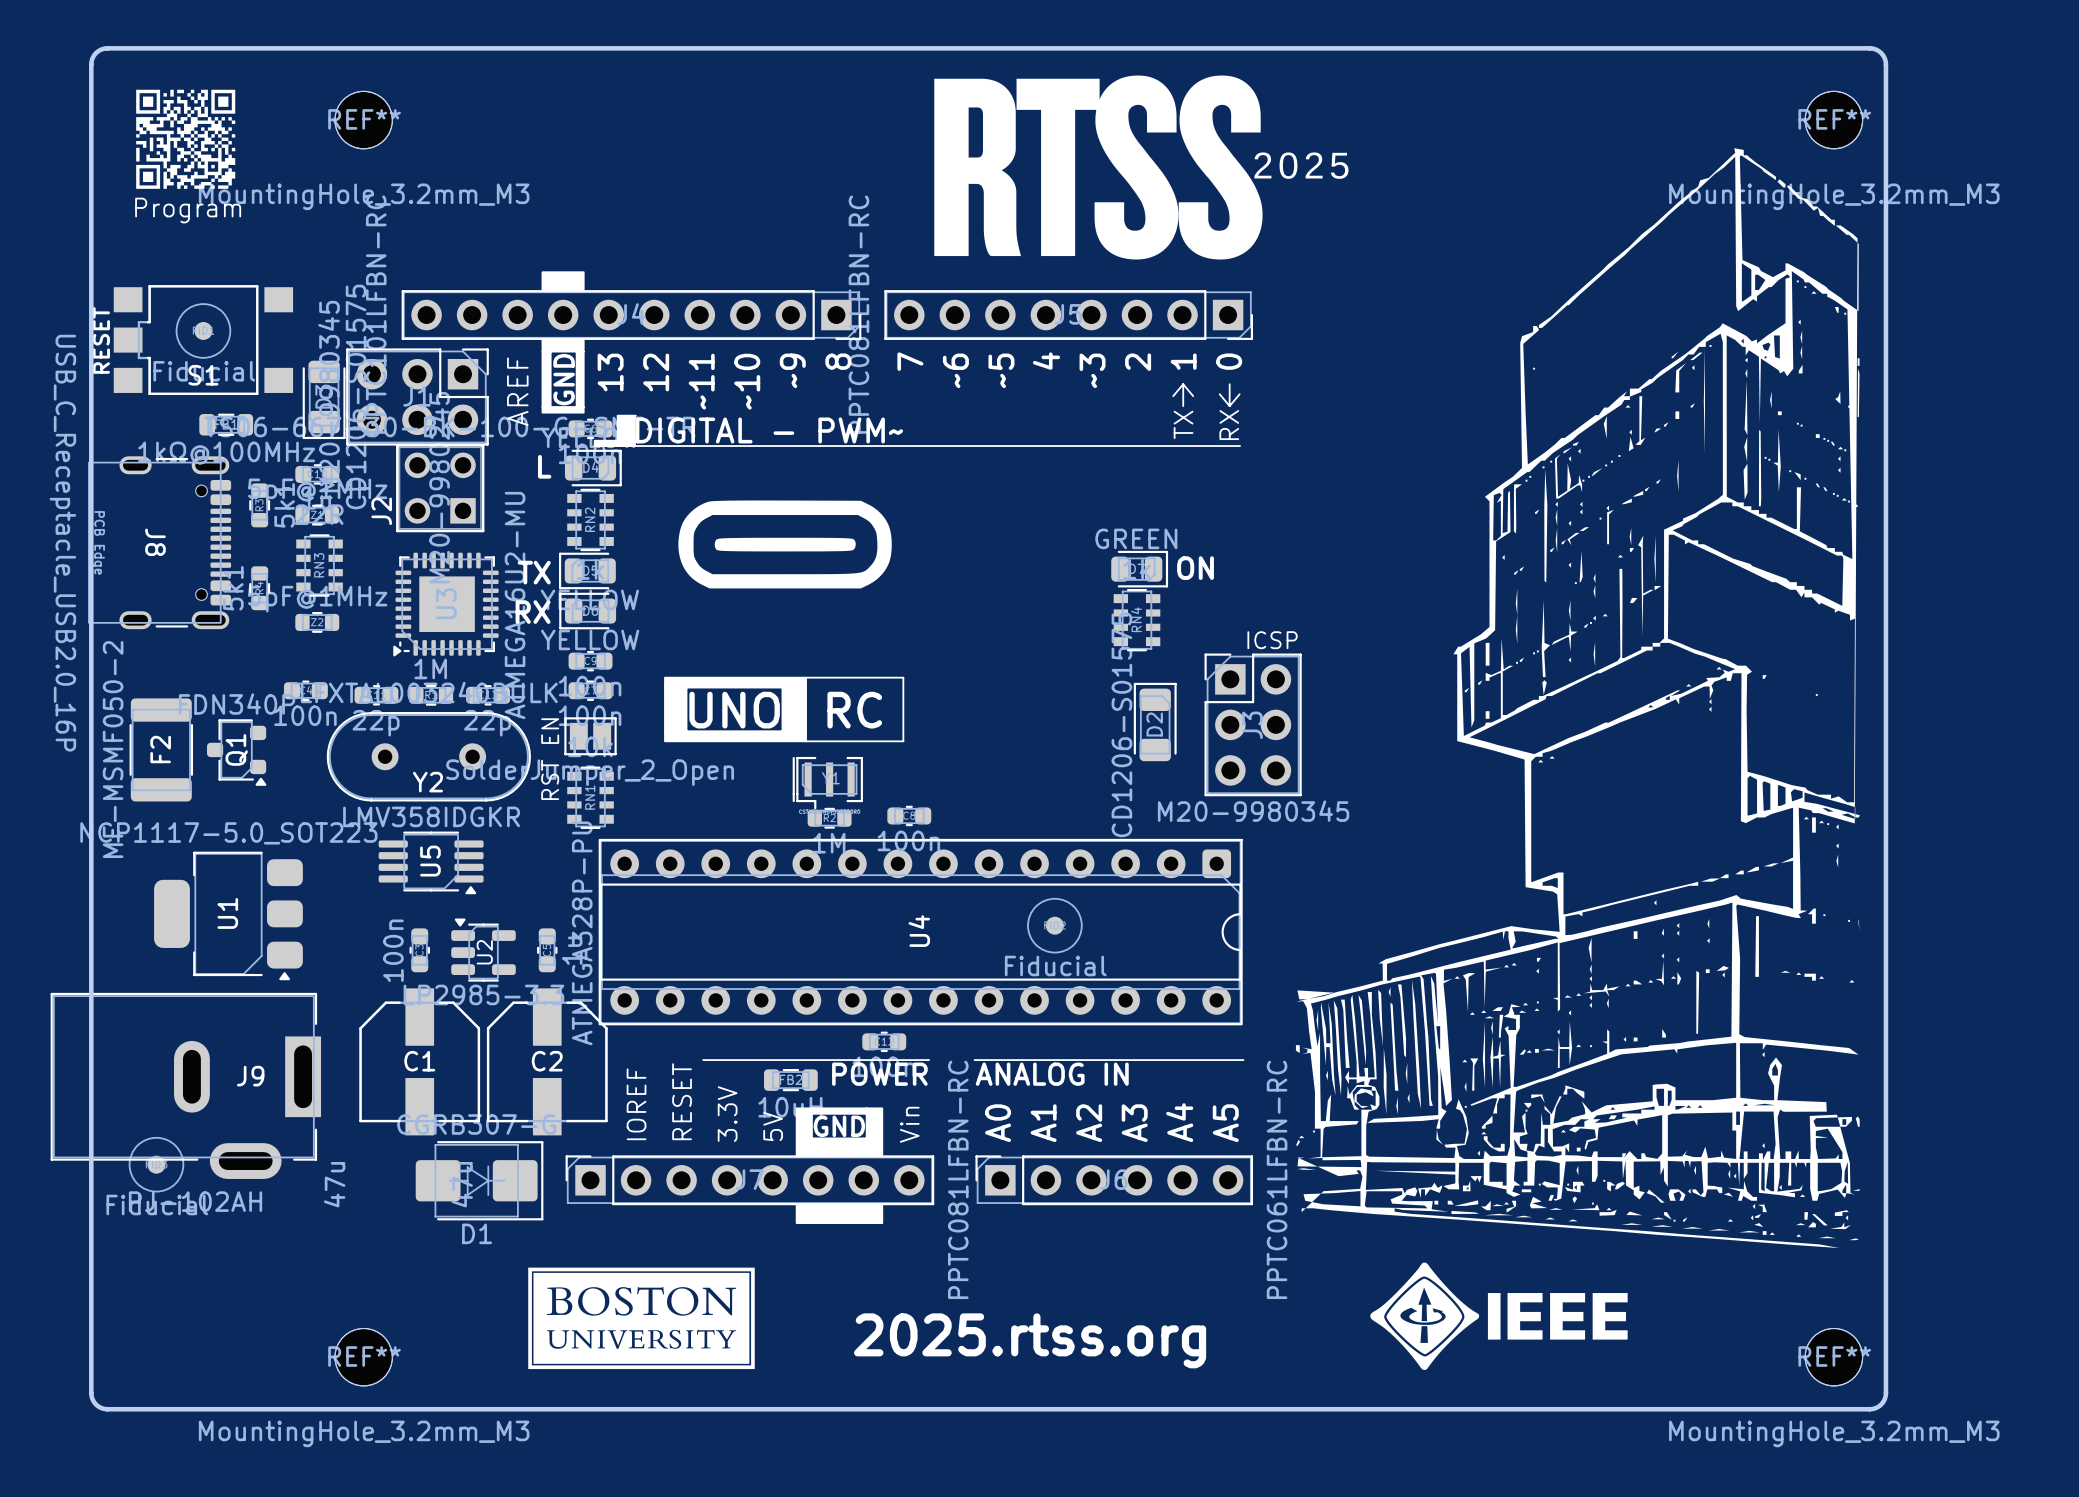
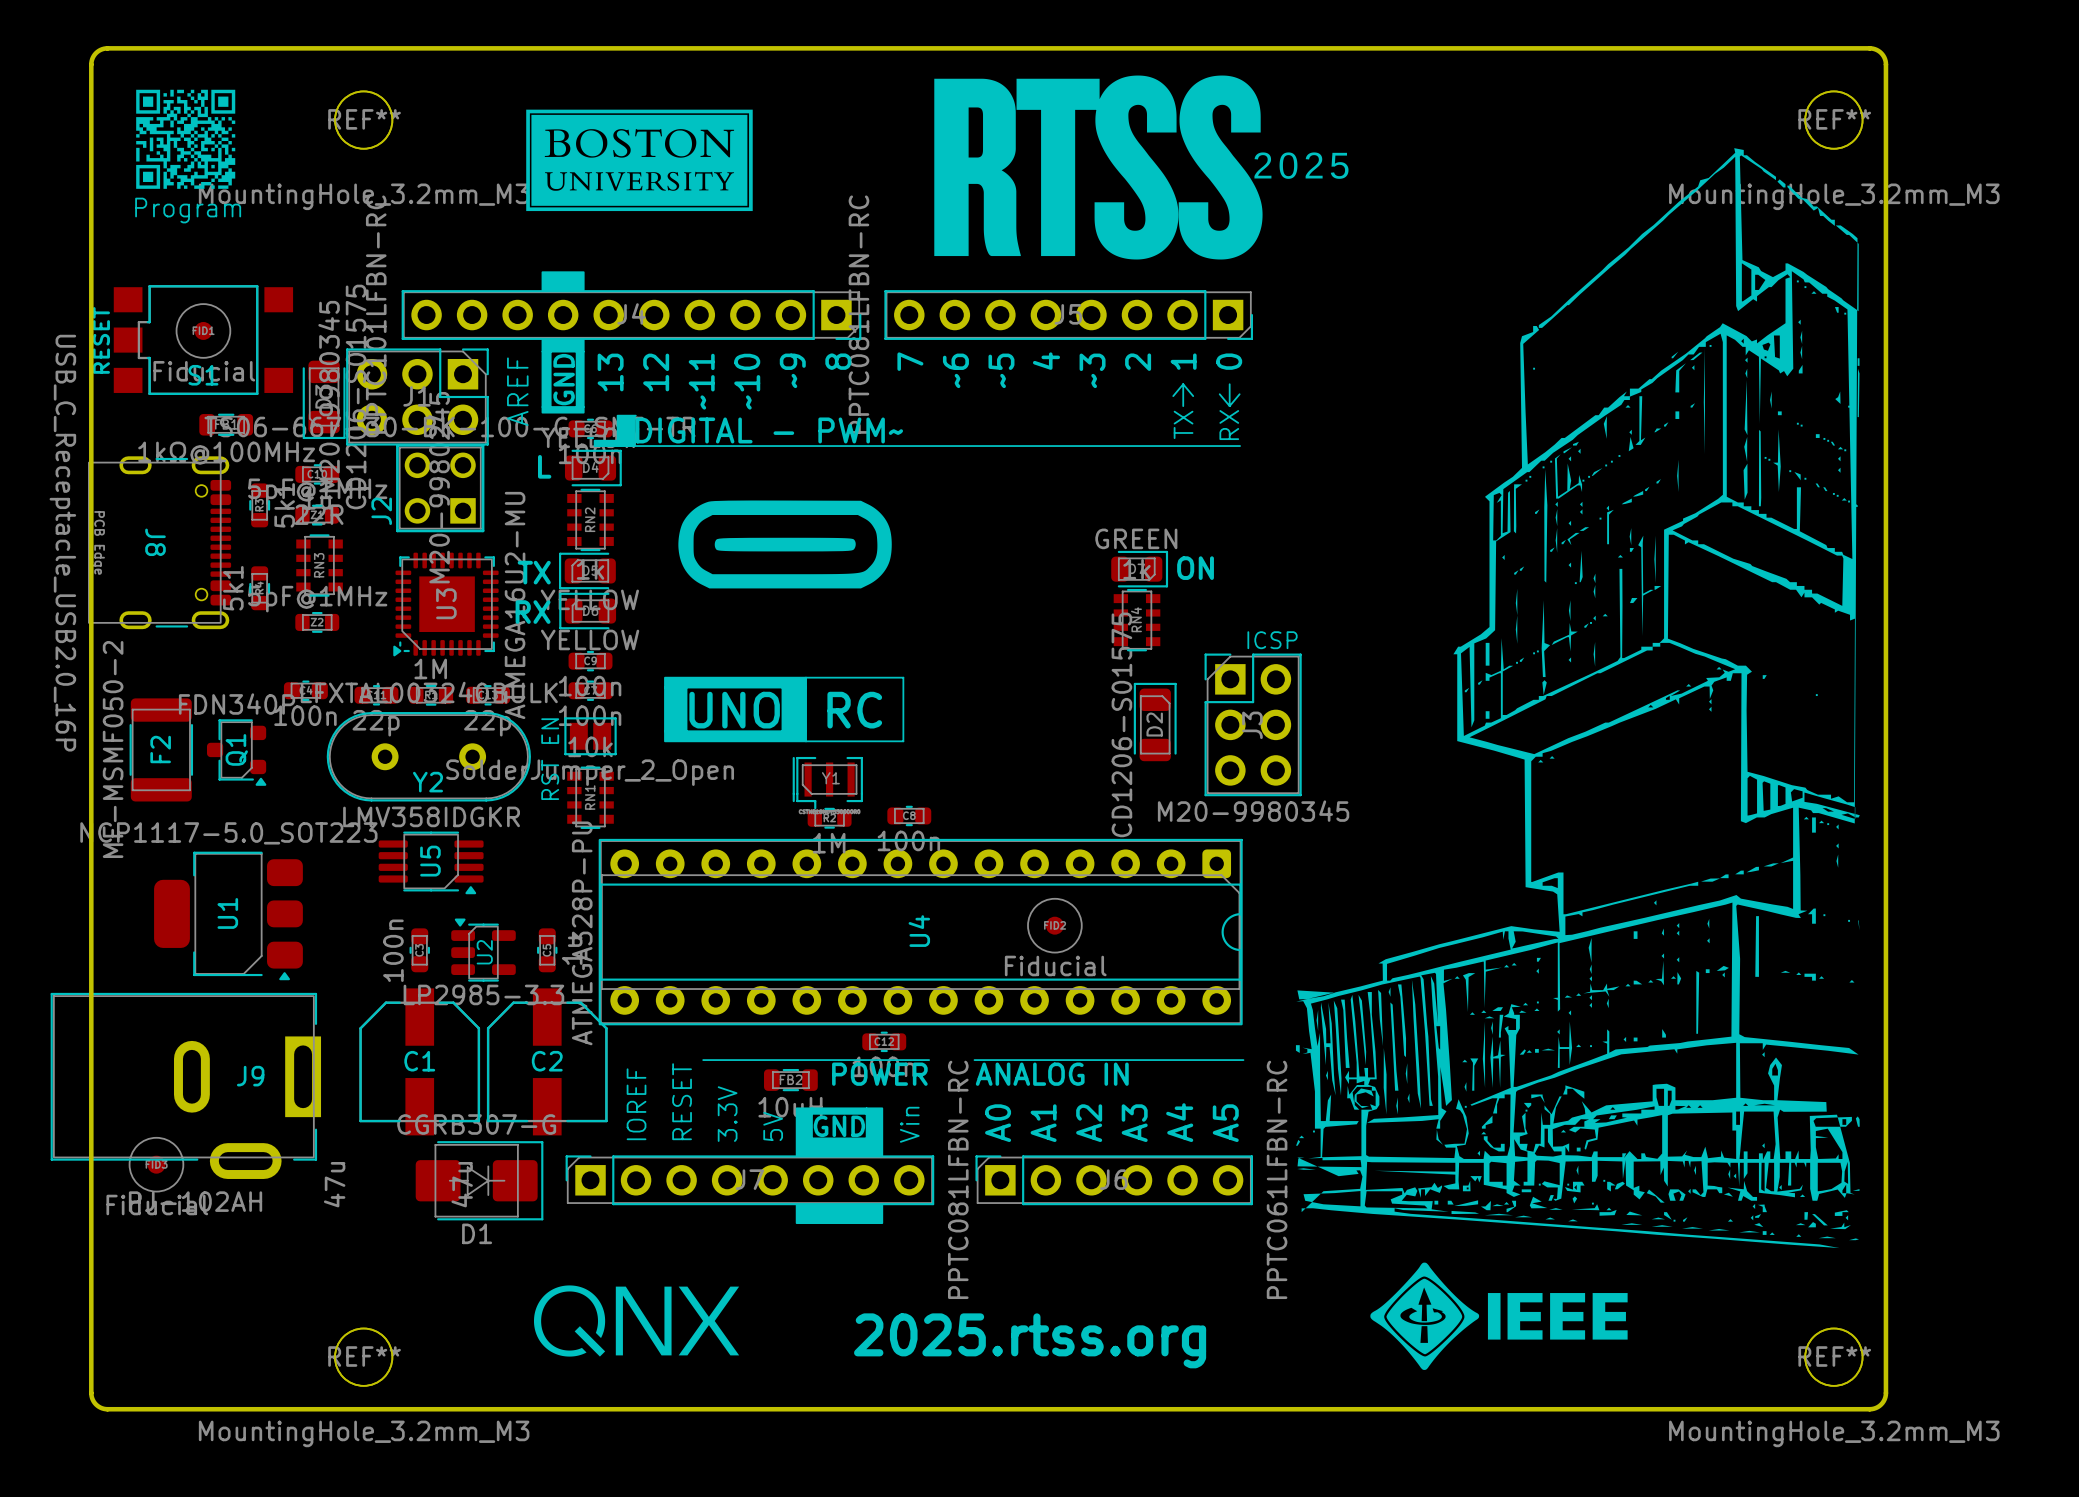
drawing: none -> [526, 109, 753, 212]
drawing: [528, 1267, 755, 1370] -> none
drawing: none -> [533, 1285, 740, 1357]

